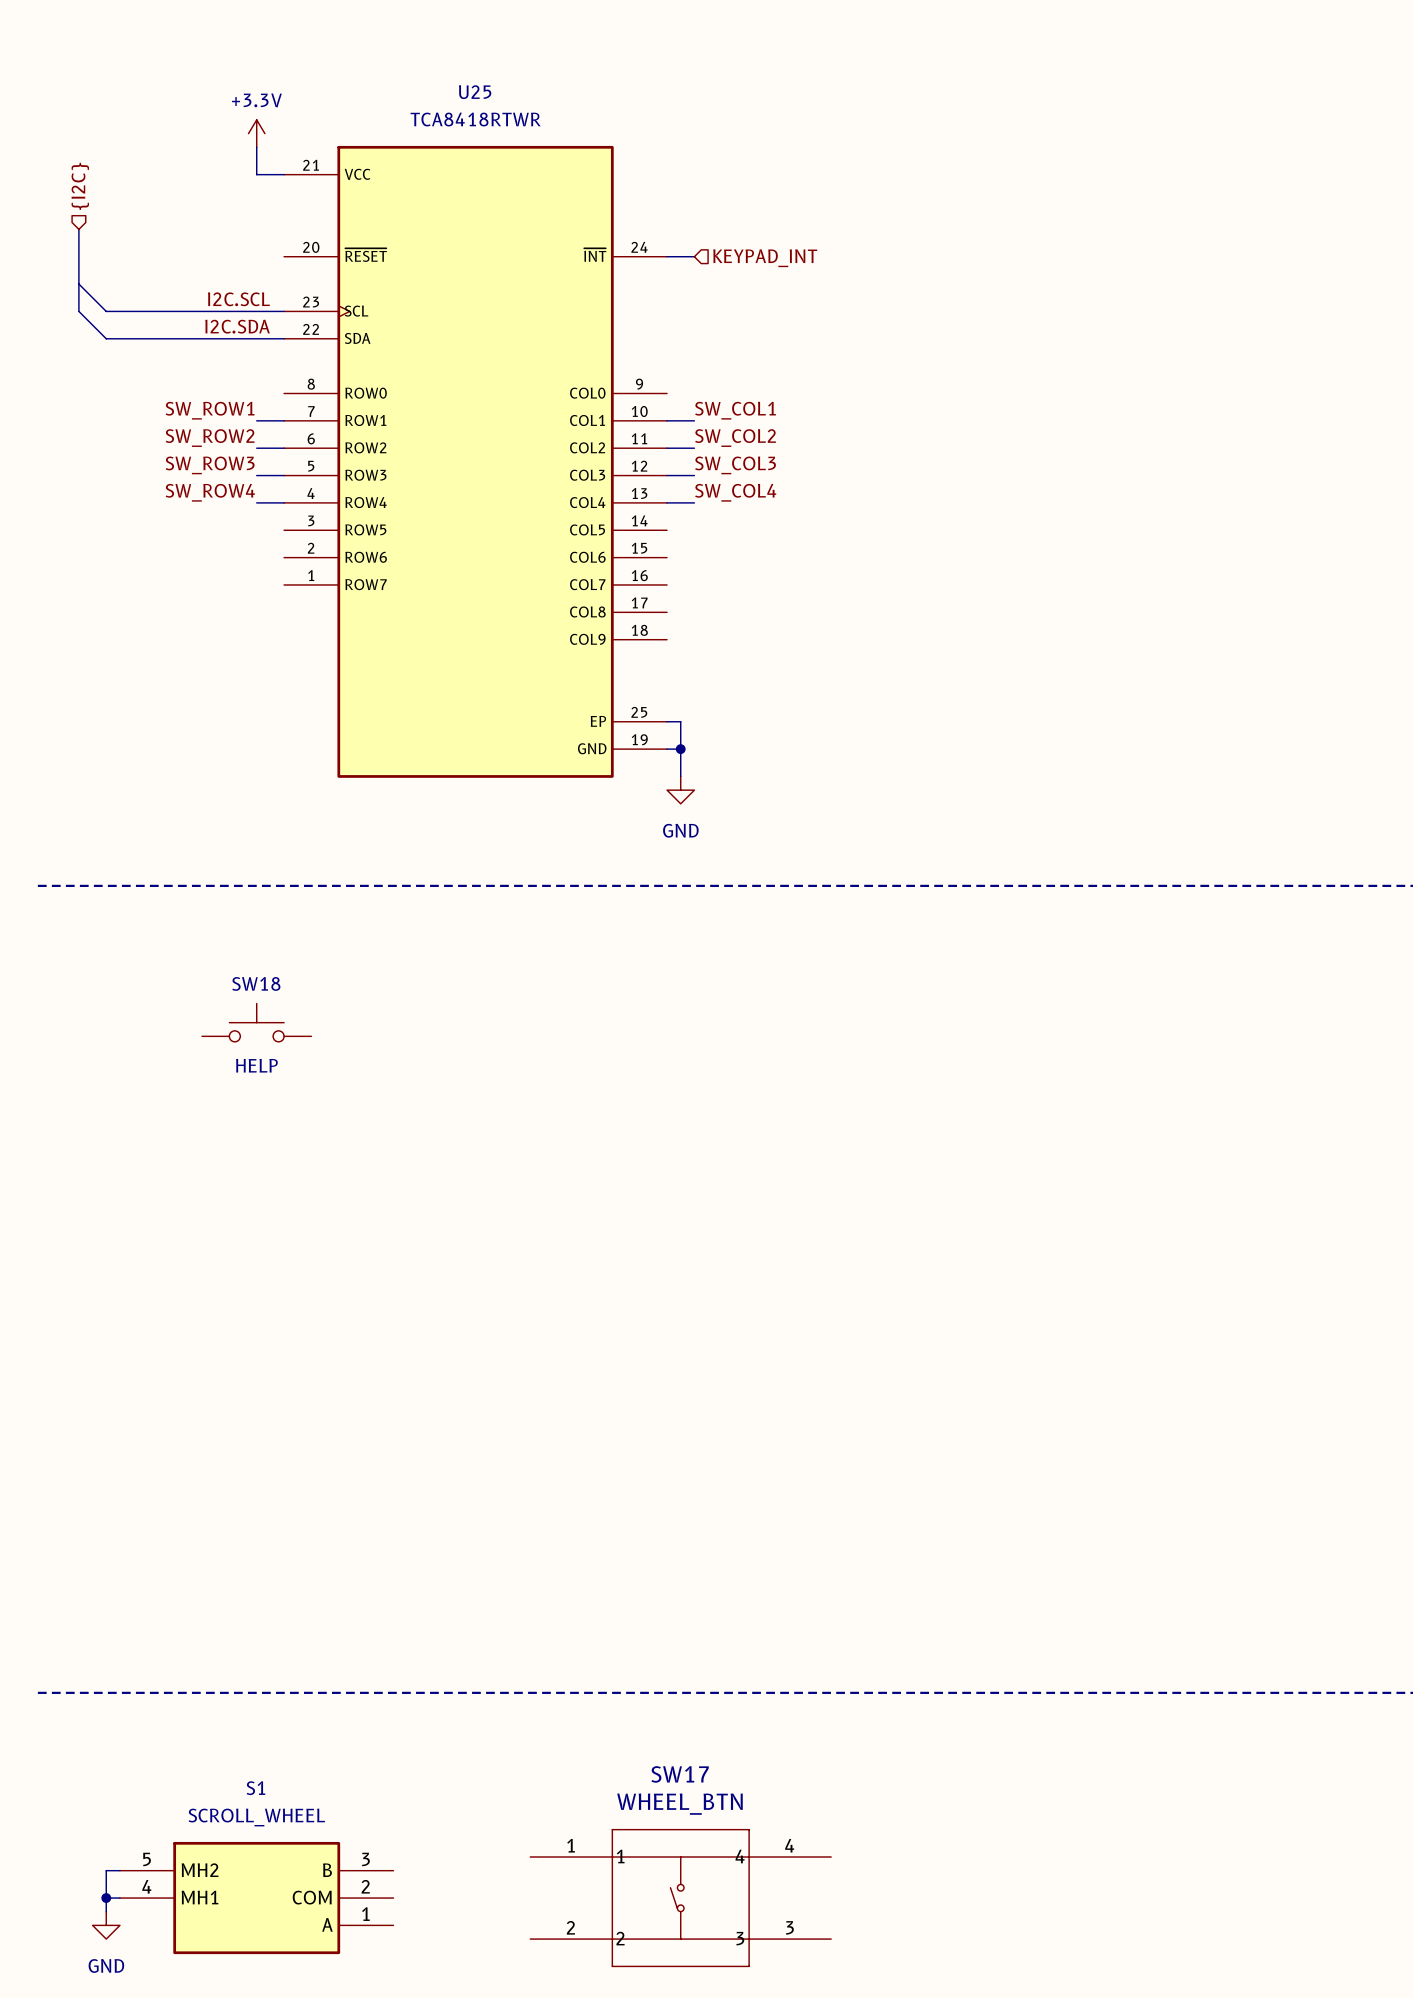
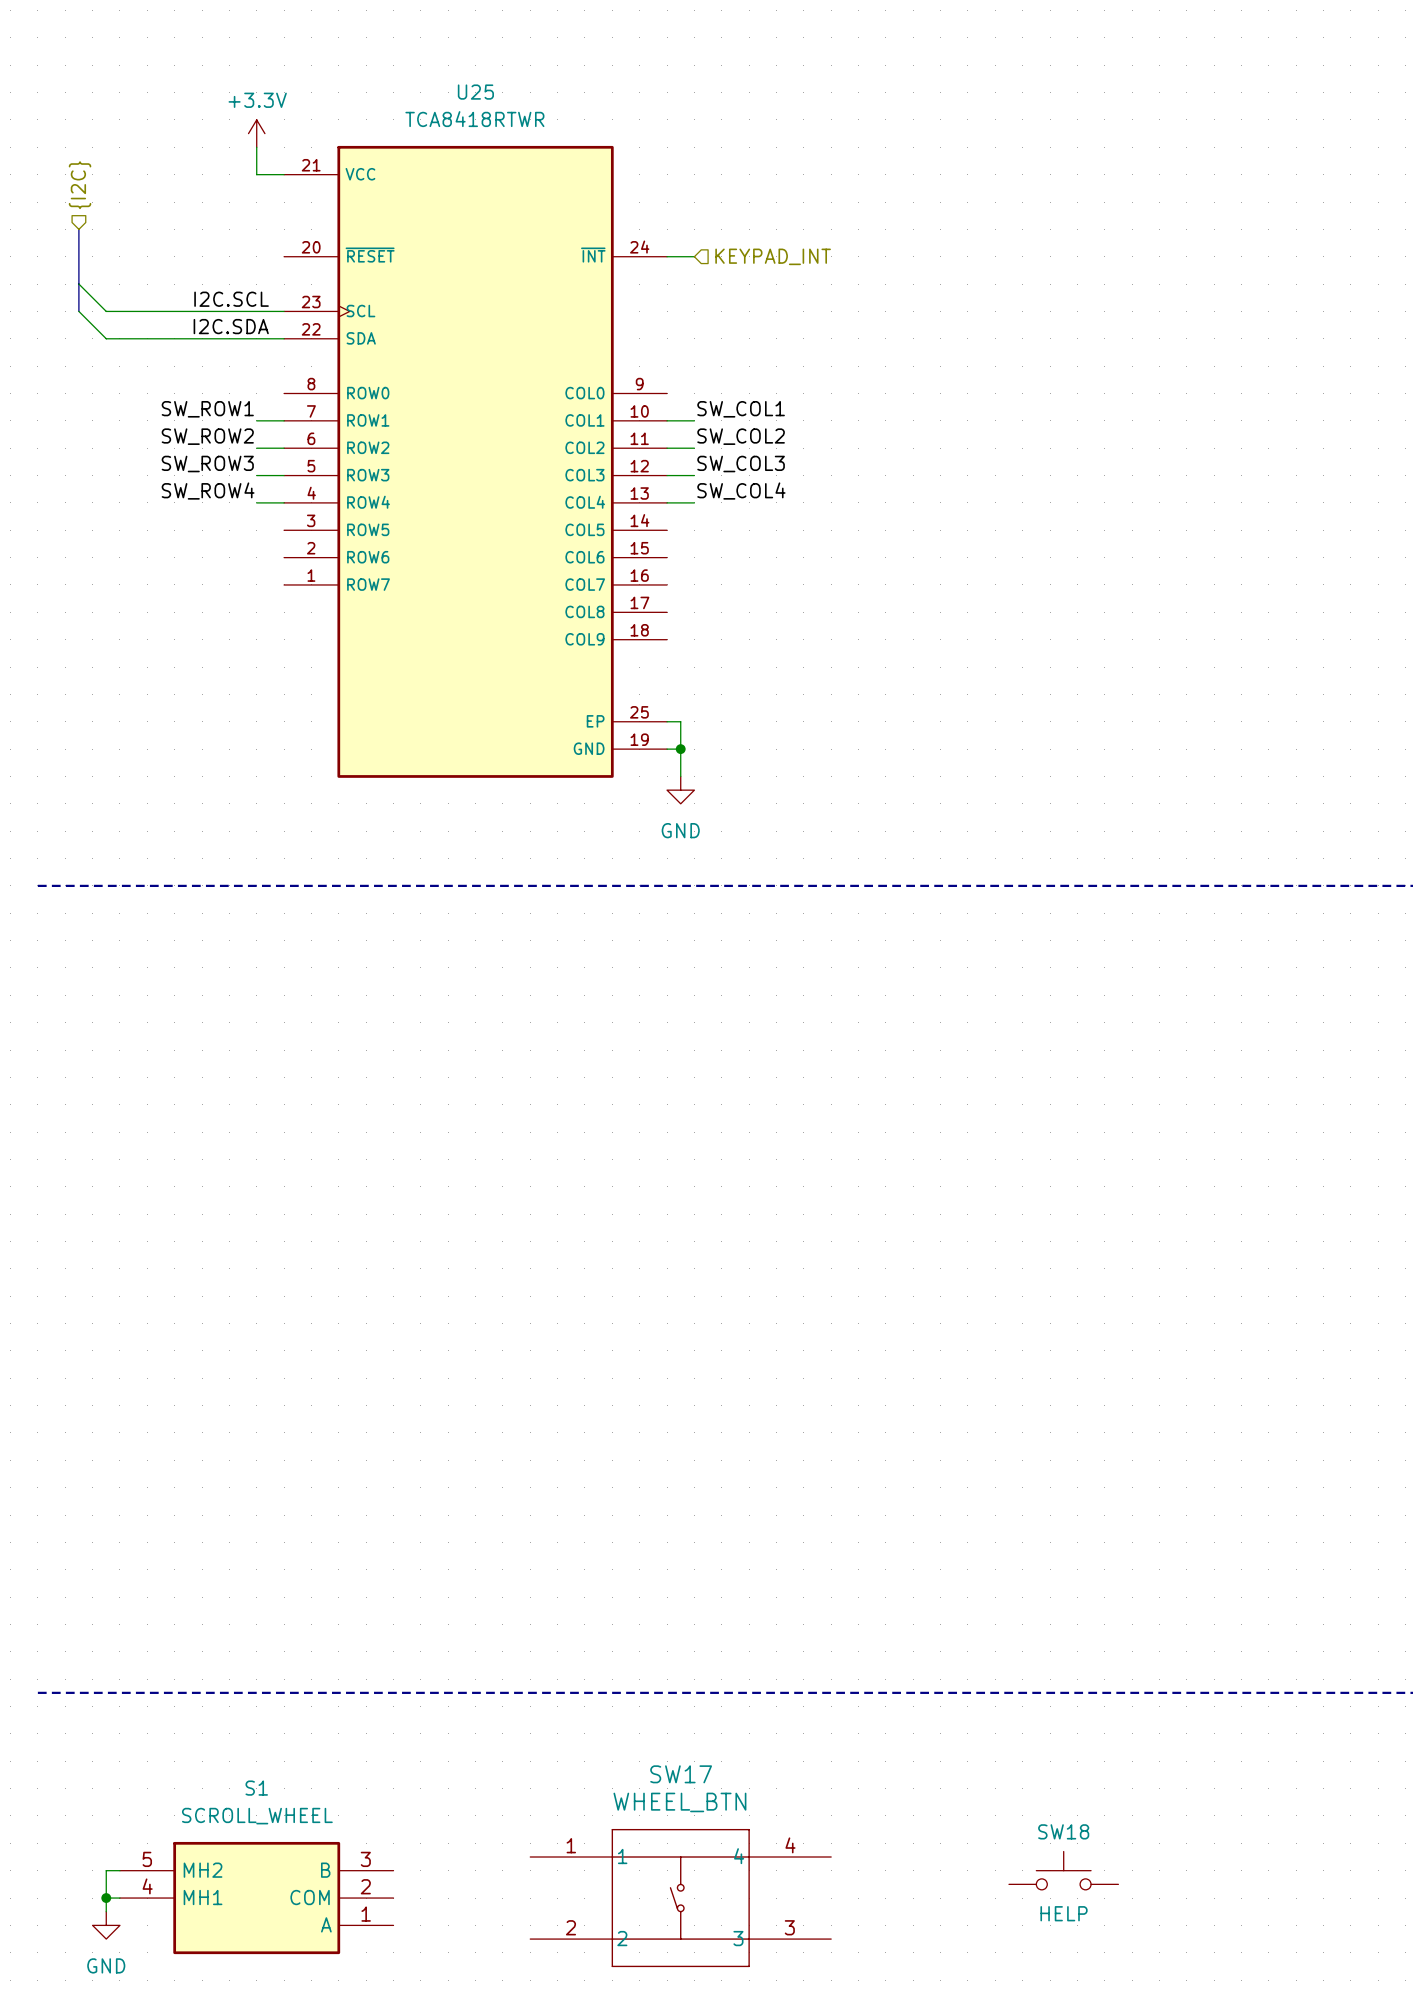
SW18 position: (256, 1022) -> (1063, 1870)

